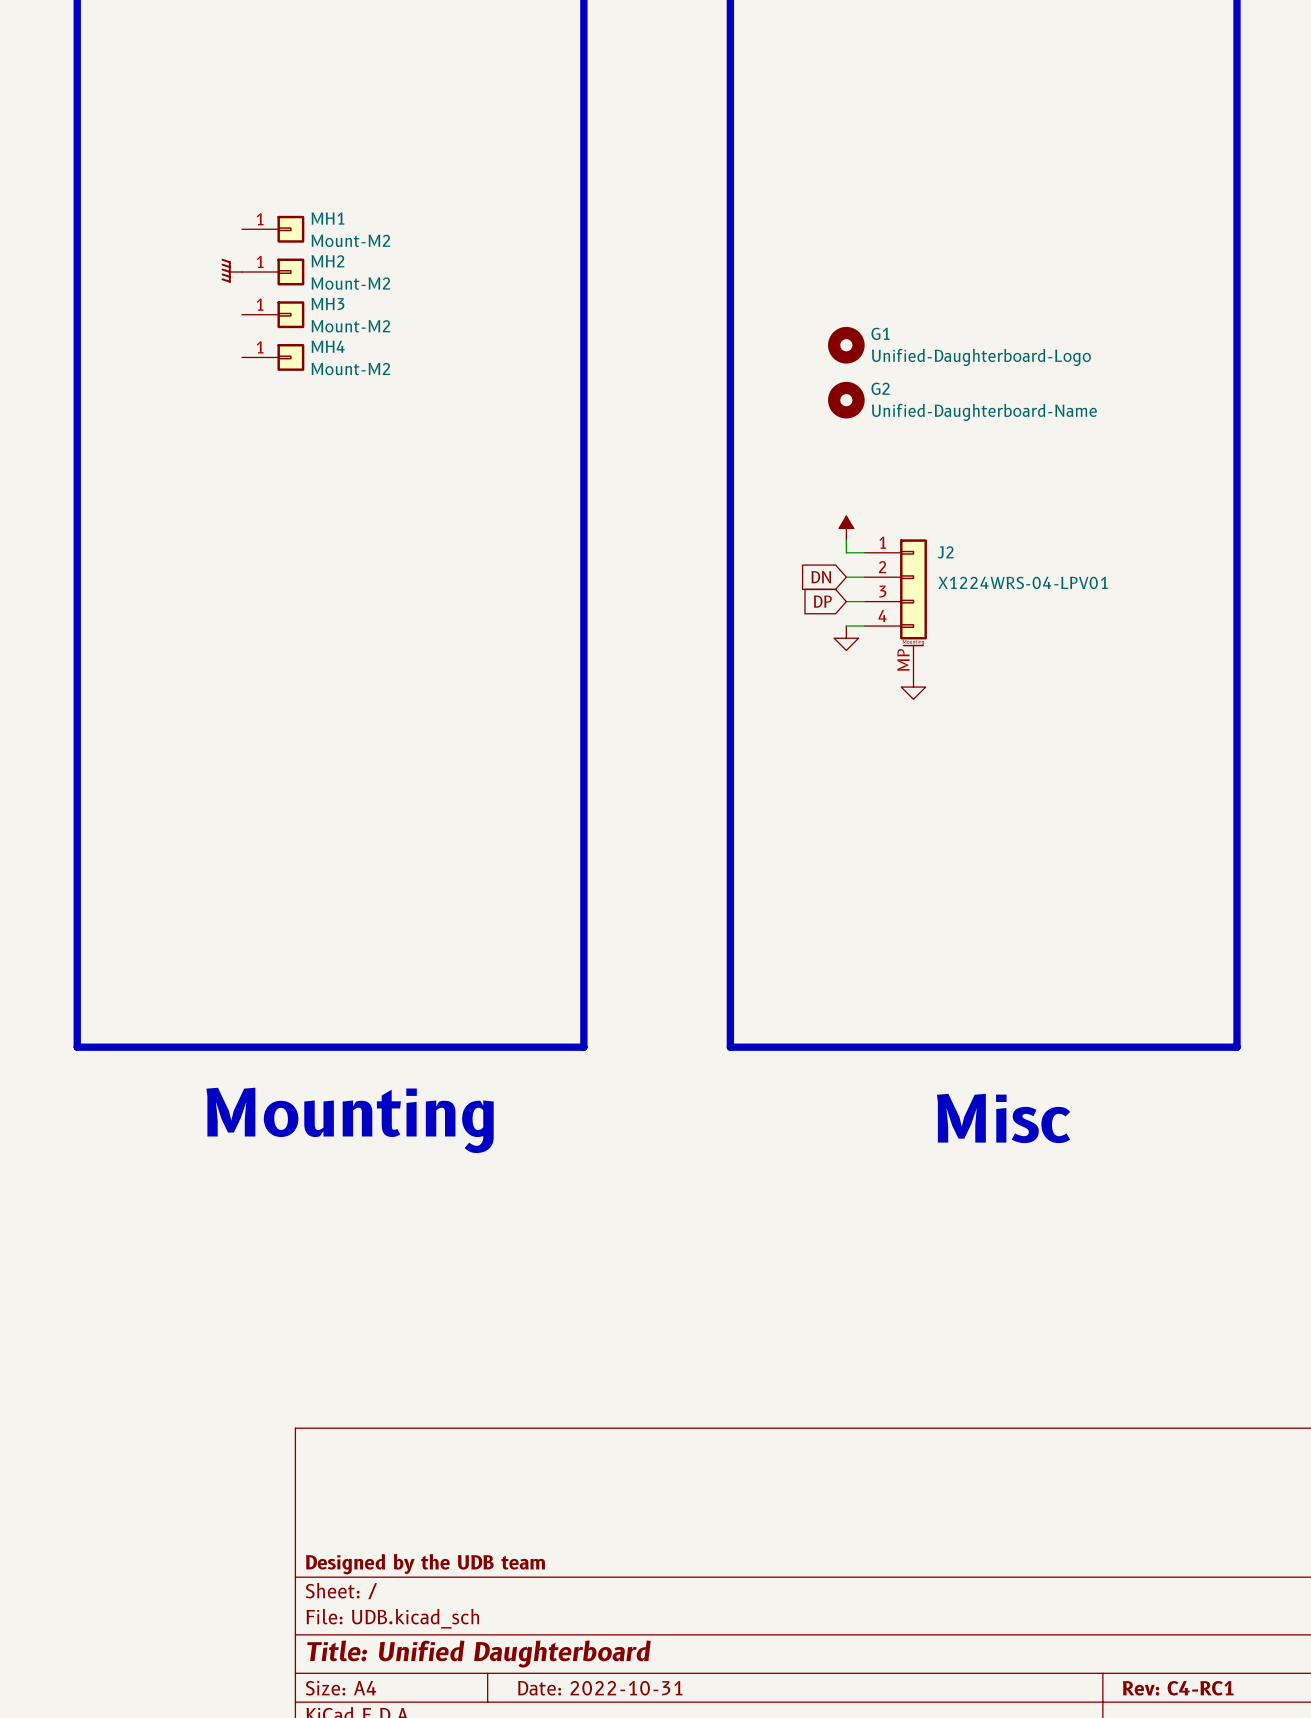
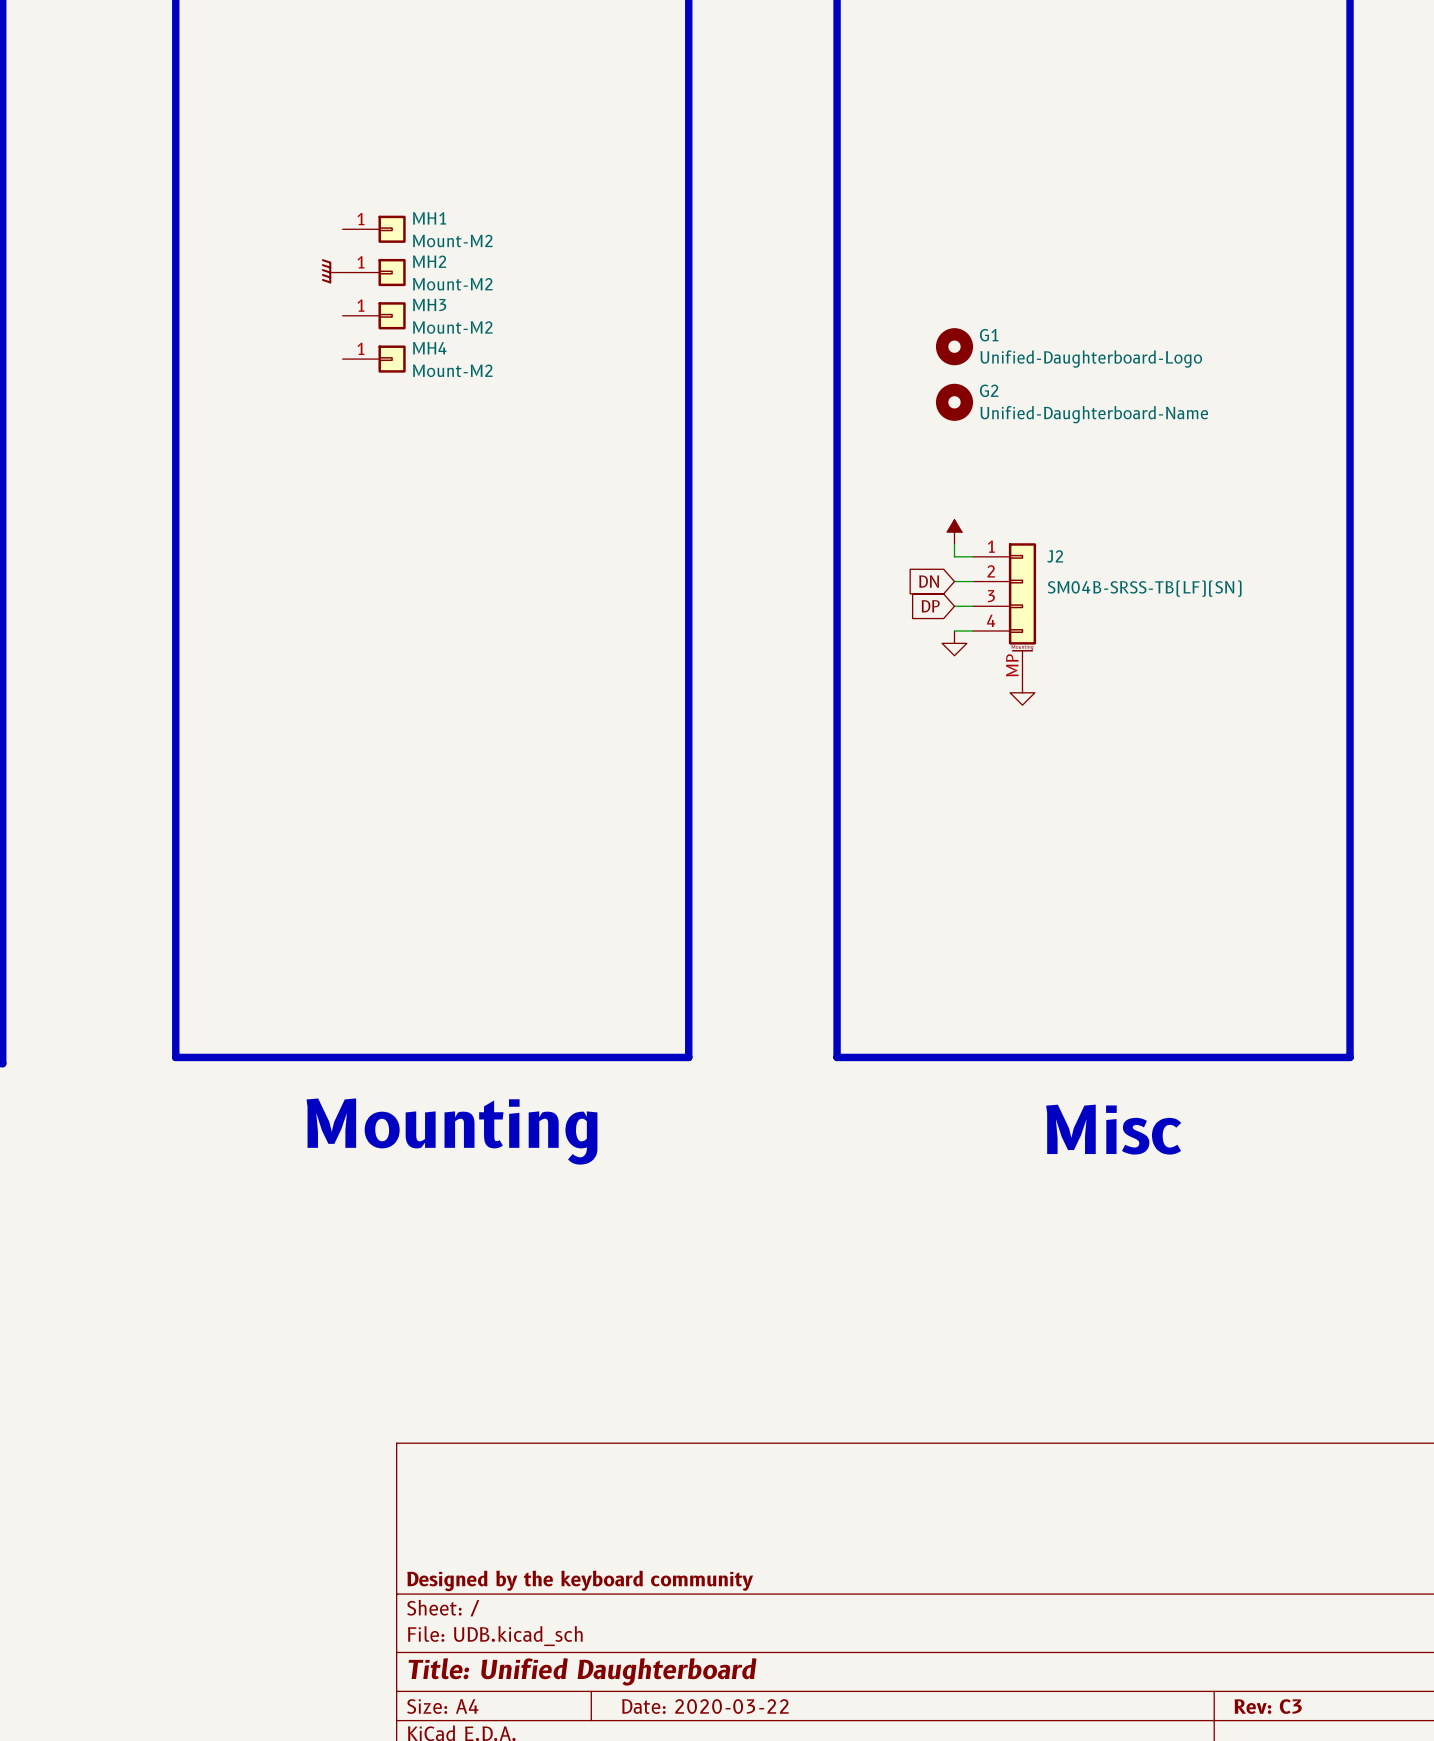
J2 value: X1224WRS-04-LPV01 (1023, 582) -> SM04B-SRSS-TB(LF)(SN) (1144, 588)
title block: Designed by the UDB team (425, 1564) -> Designed by the keyboard community (580, 1580)
title block: Date: 2022-10-31 (600, 1688) -> Date: 2020-03-22 (705, 1706)
title block: Rev: C4-RC1 (1178, 1688) -> Rev: C3 (1268, 1706)

